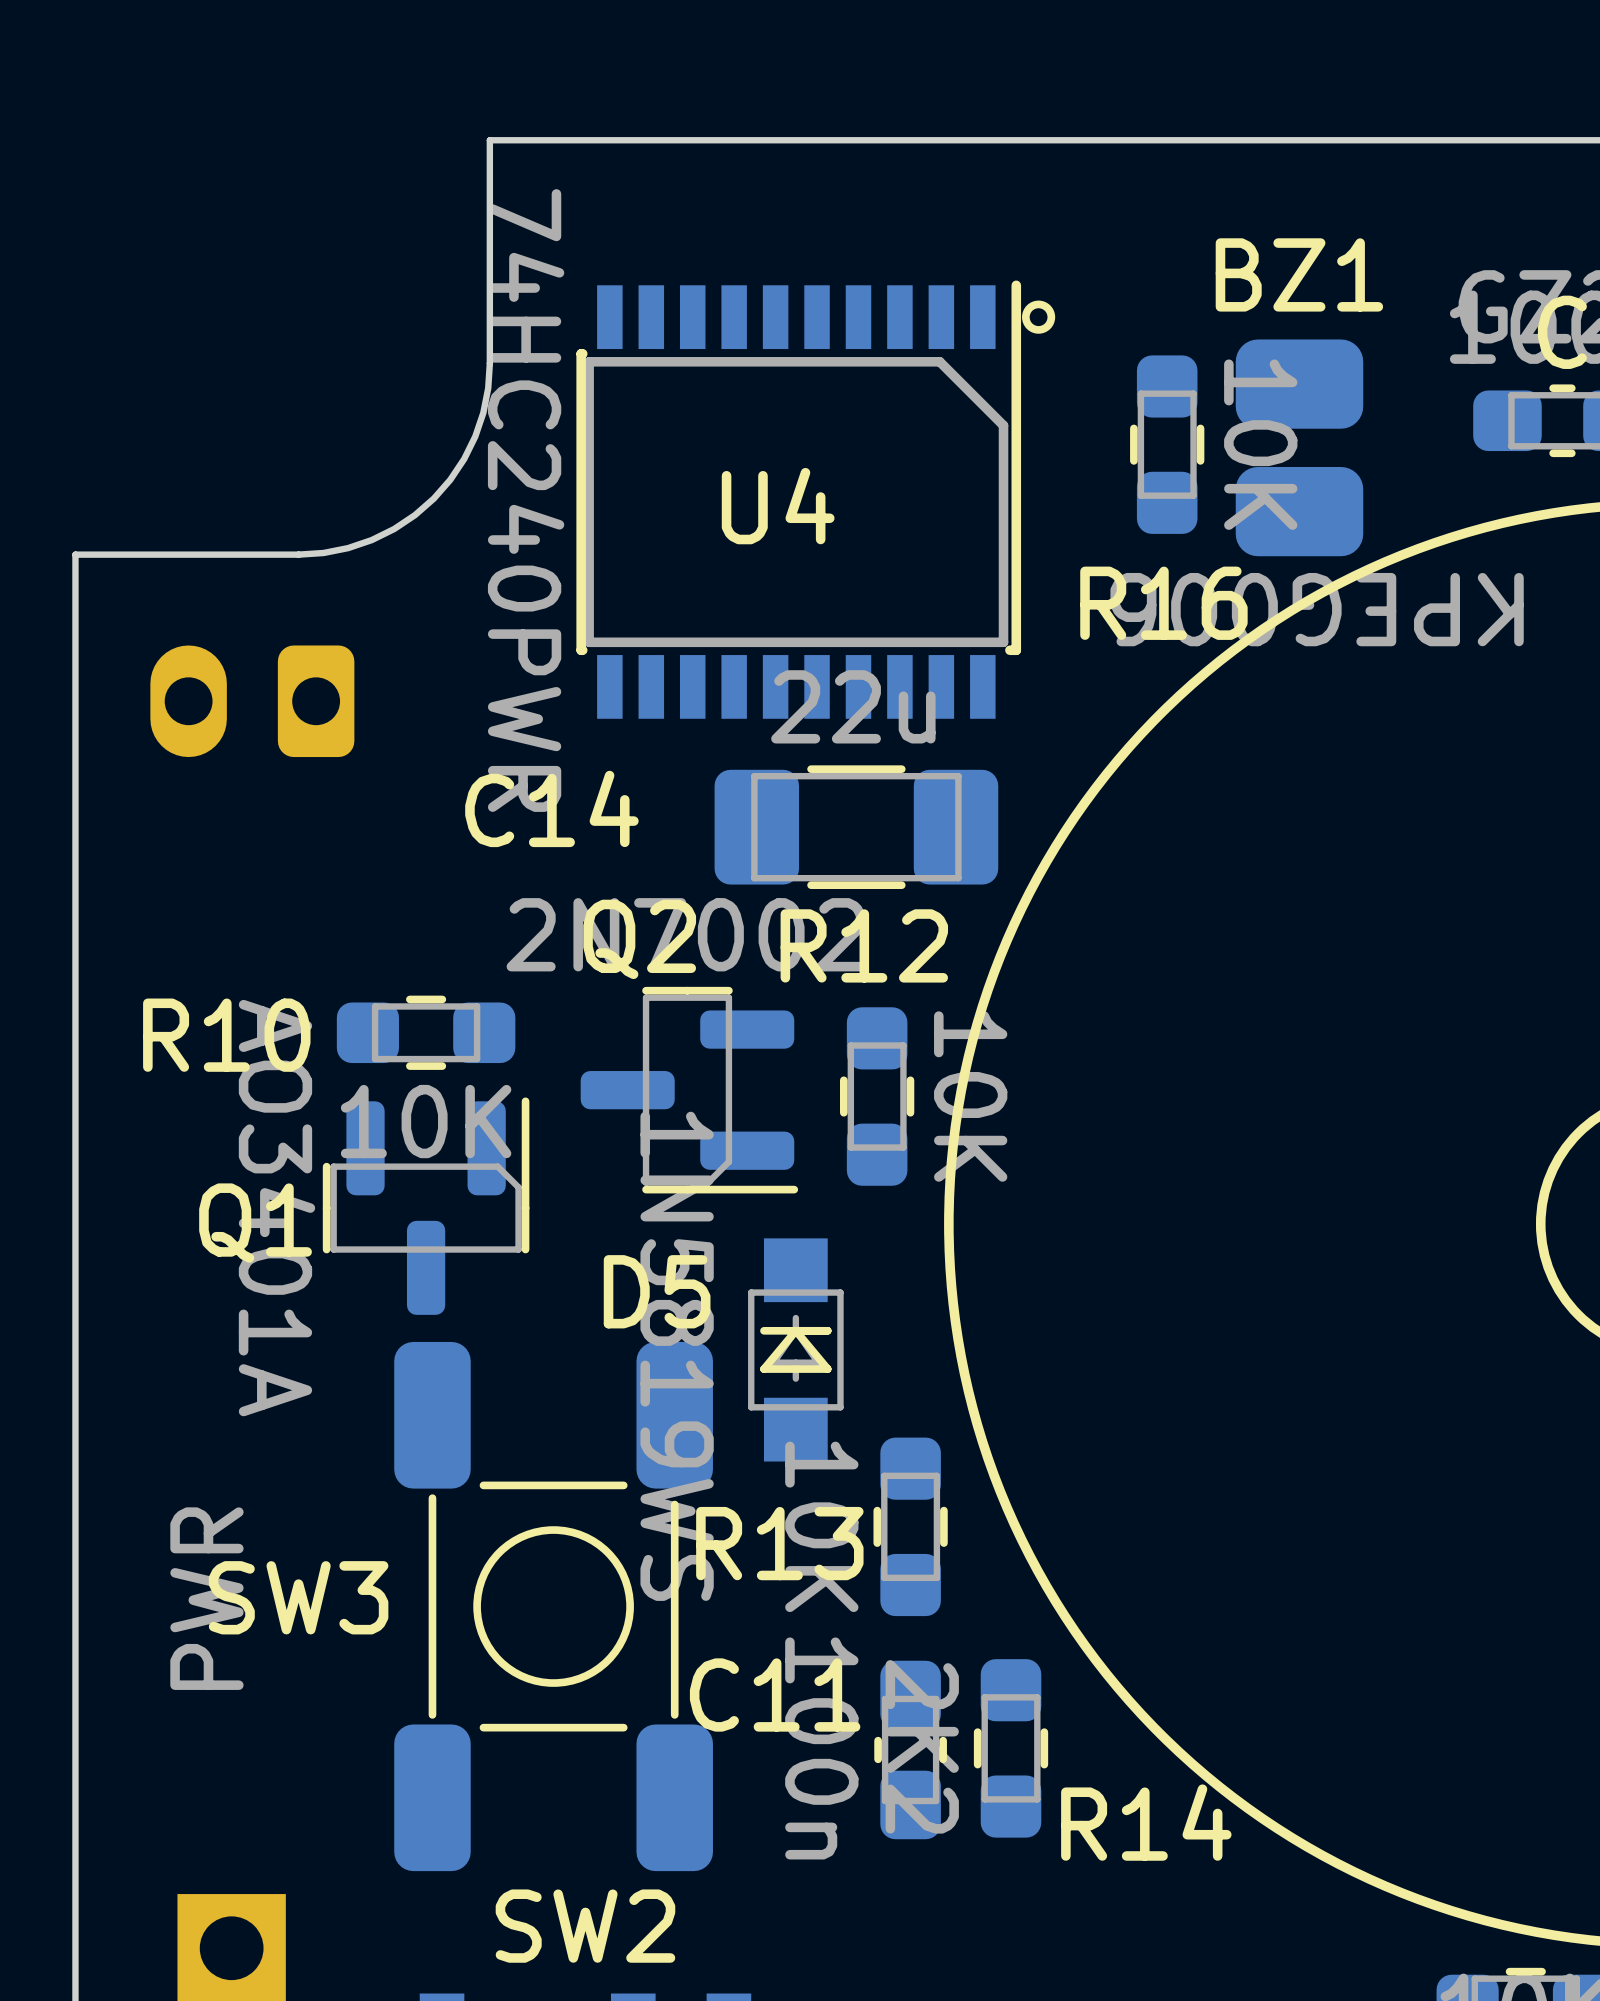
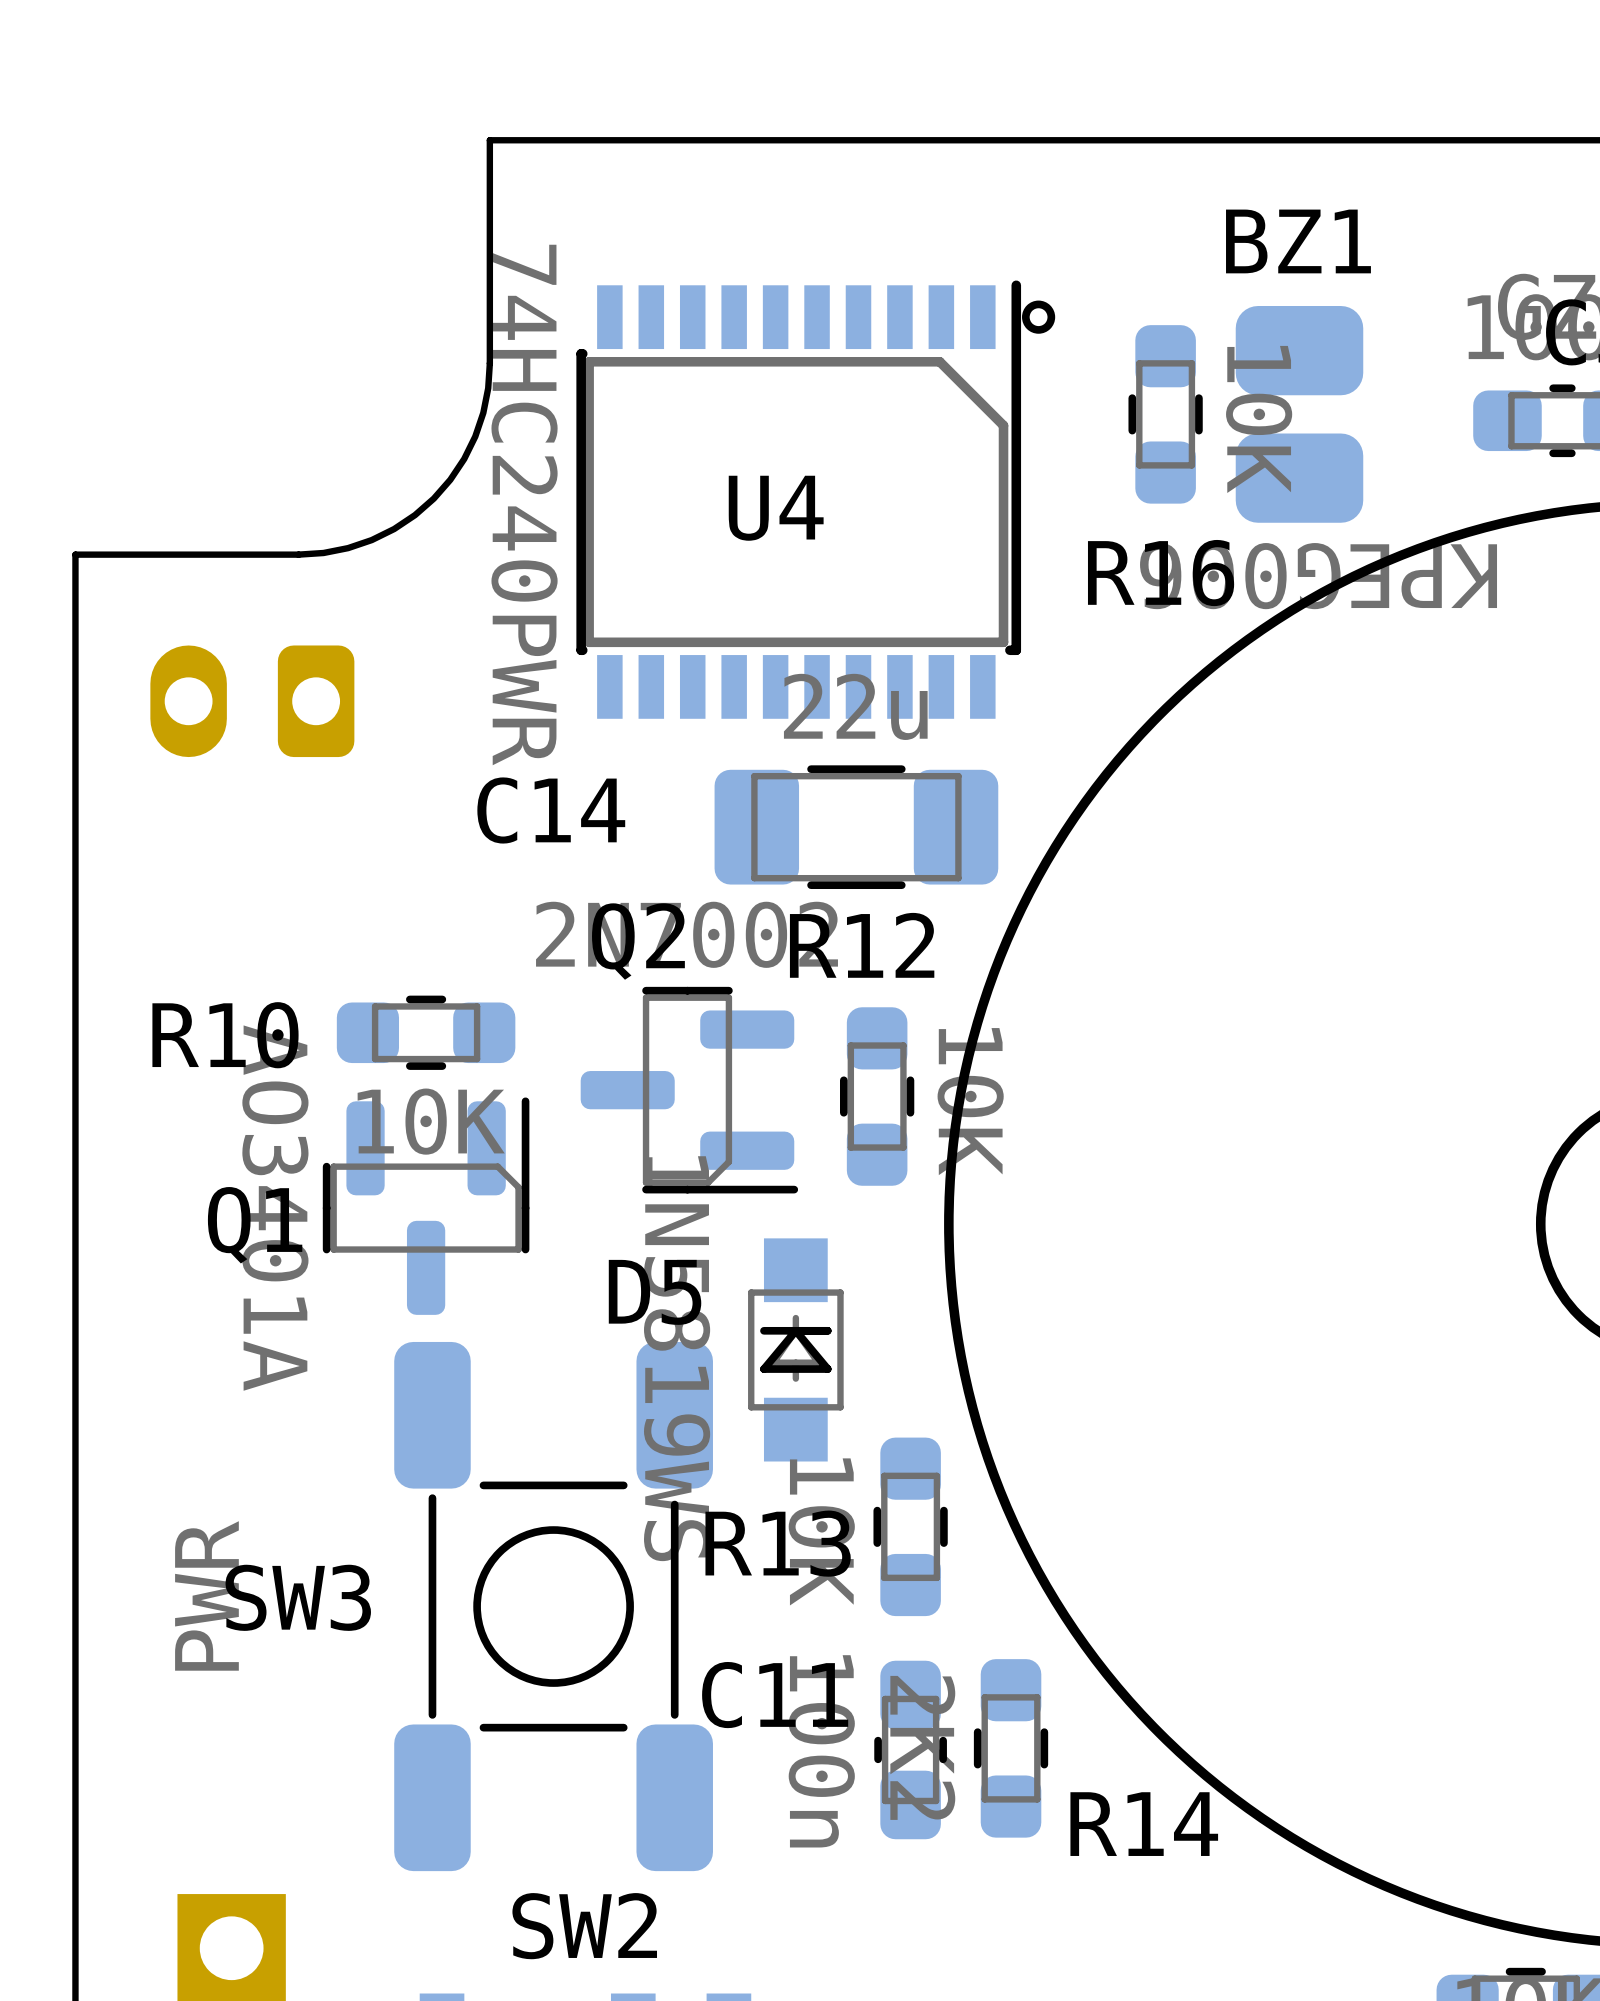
R16 position: (1167, 444) -> (1165, 414)
BZ1 position: (1299, 447) -> (1299, 414)

